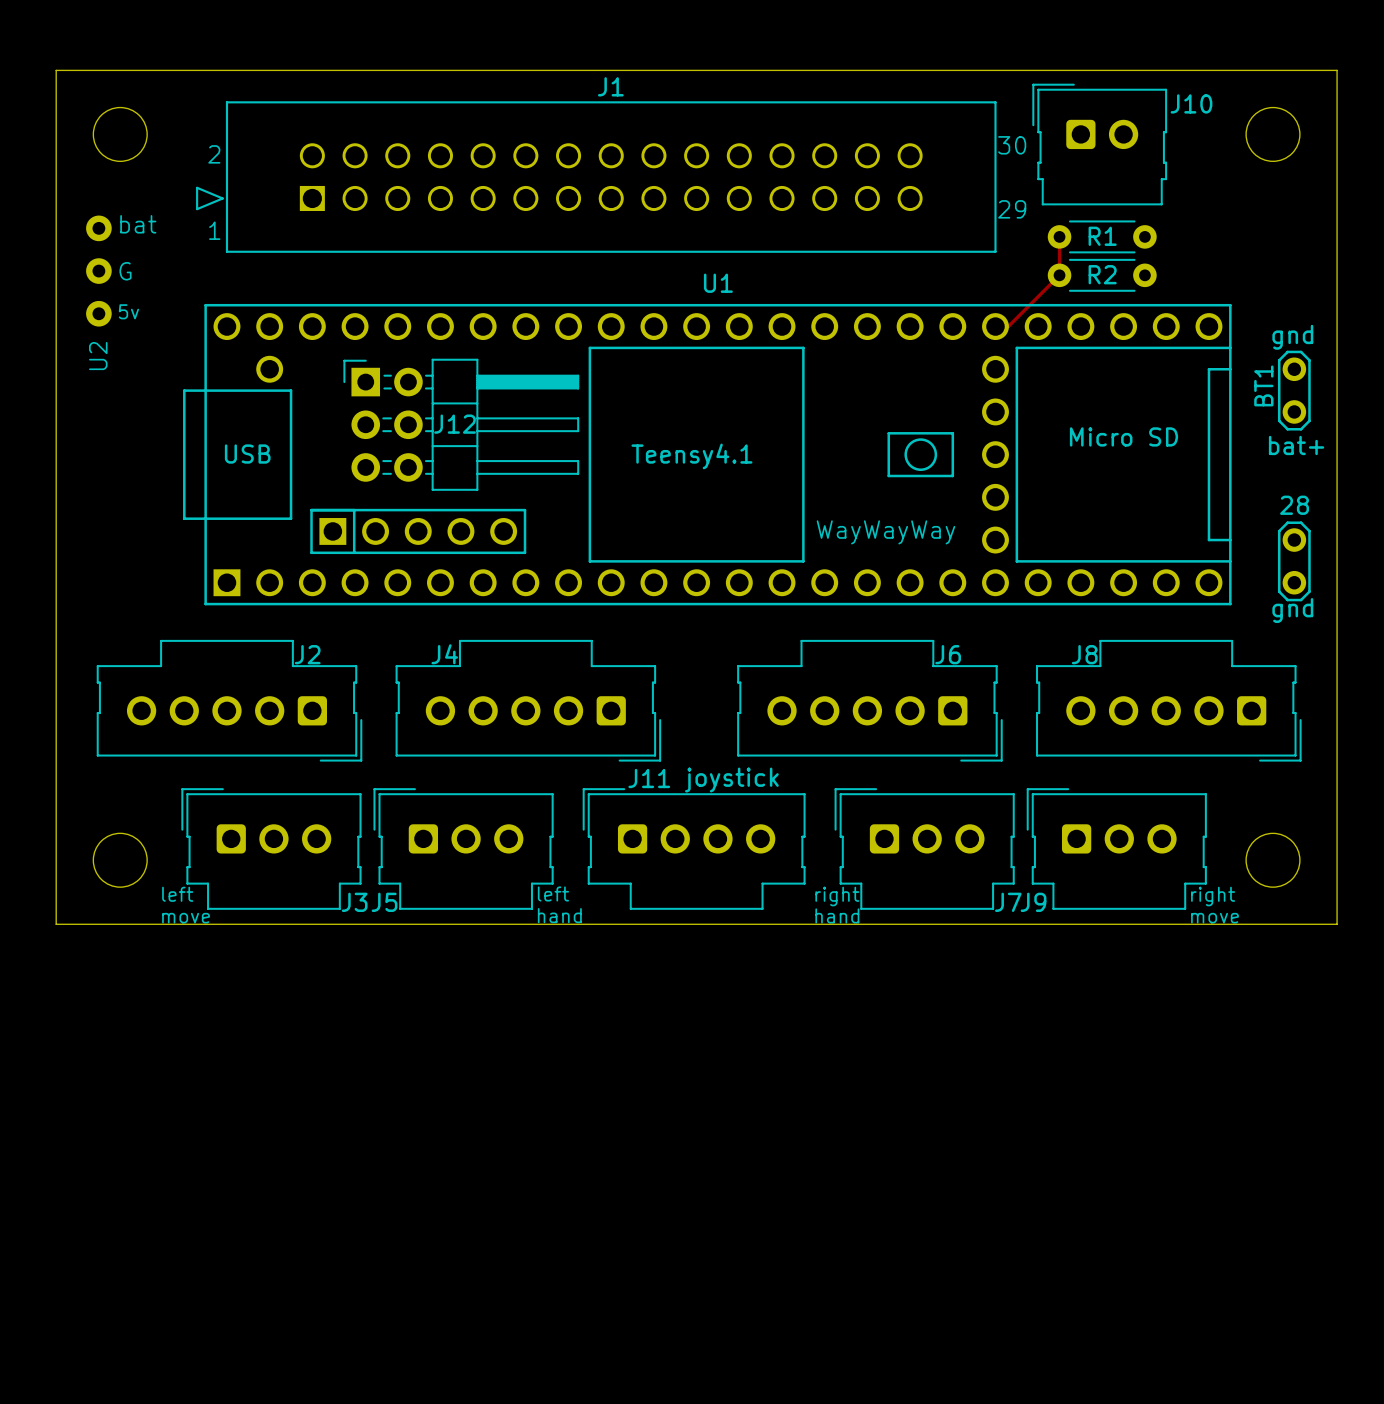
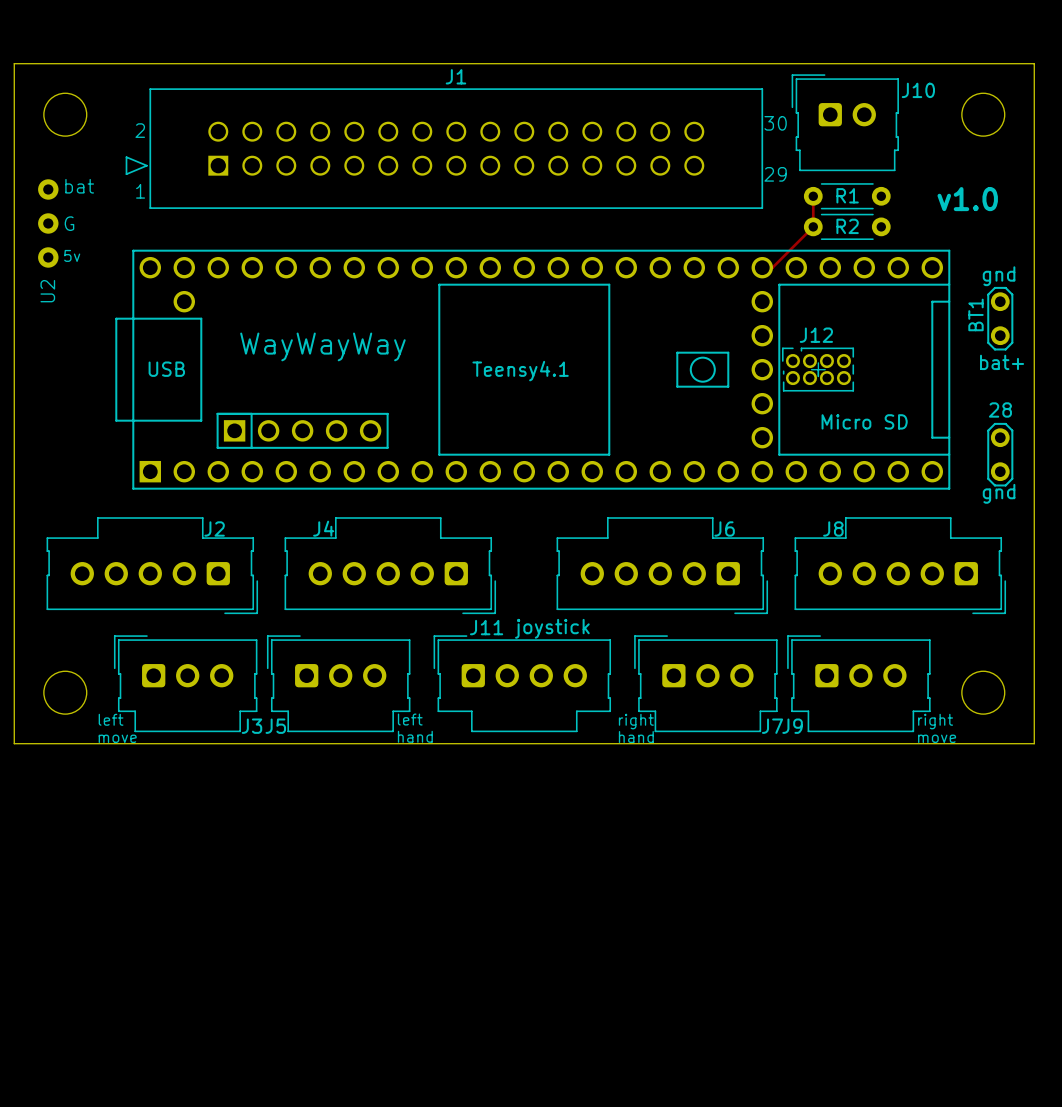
text: none -> v1.0 (967, 199)
J12 footprint: [343, 358, 580, 491] -> [781, 347, 855, 392]
J12 name position: J12 (455, 424) -> J12 (816, 335)
text: none -> WayWayWay (322, 346)
U1: Teensy4.1 (707, 454) -> none
part: none -> Teensy4.1 (532, 369)
text: WayWayWay (885, 532) -> none

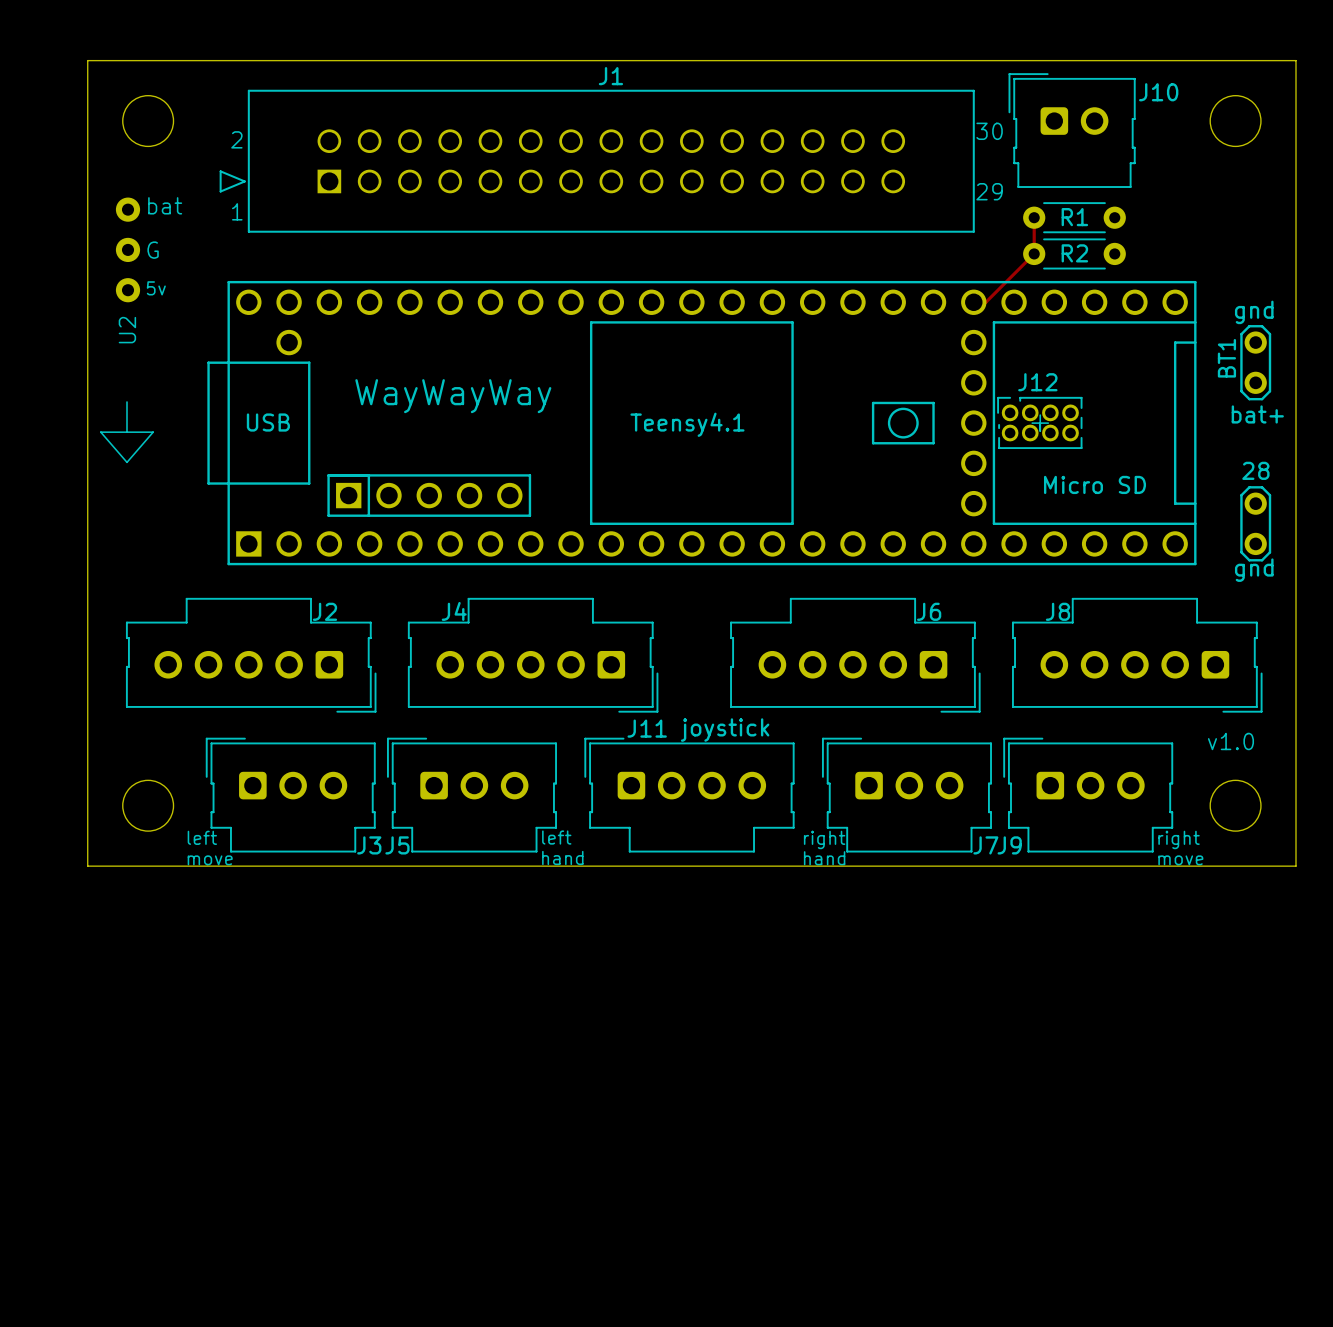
text: v1.0 (967, 199) -> none
line: none -> (126, 401) (126, 432)
line: none -> (100, 432) (153, 432) (126, 462) (100, 432)
text: none -> v1.0 (1230, 741)

